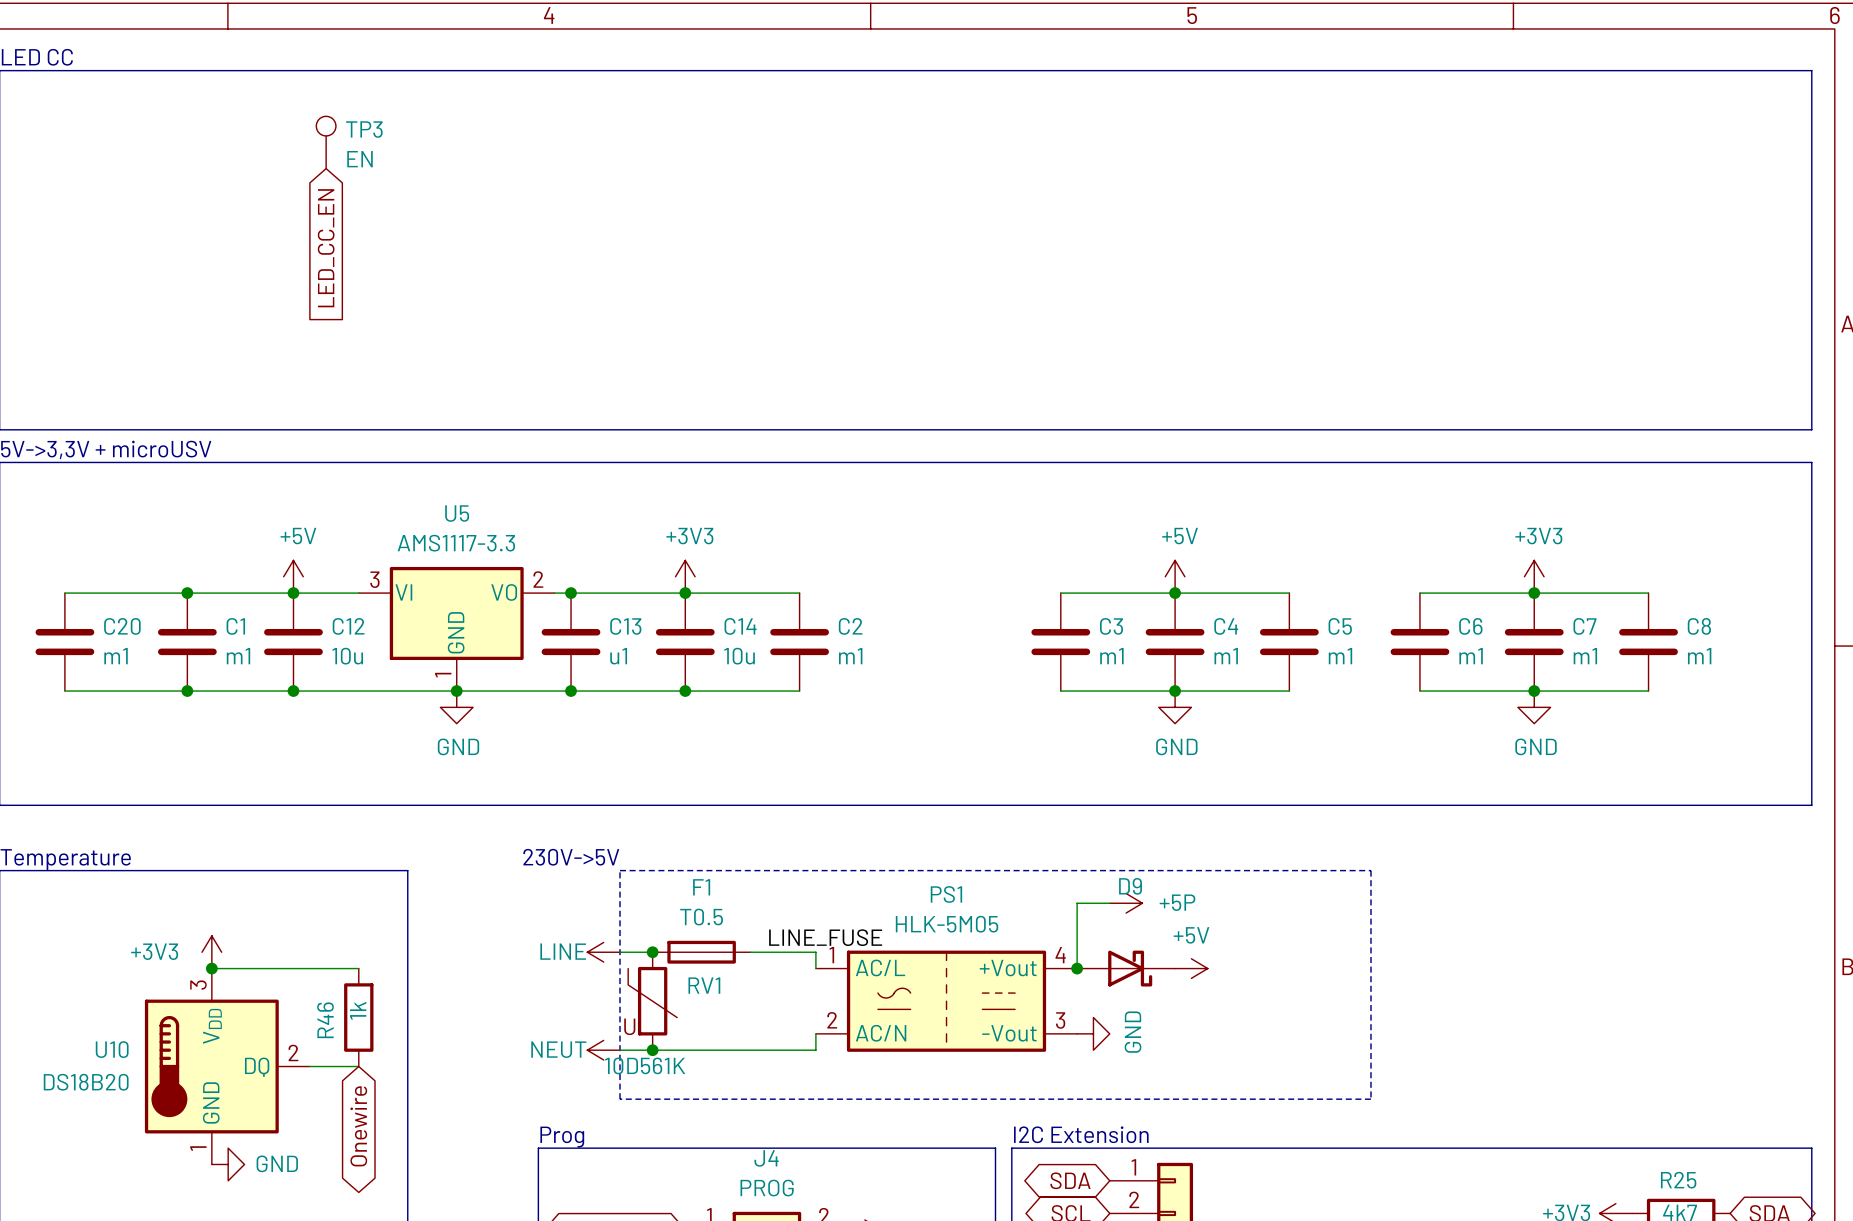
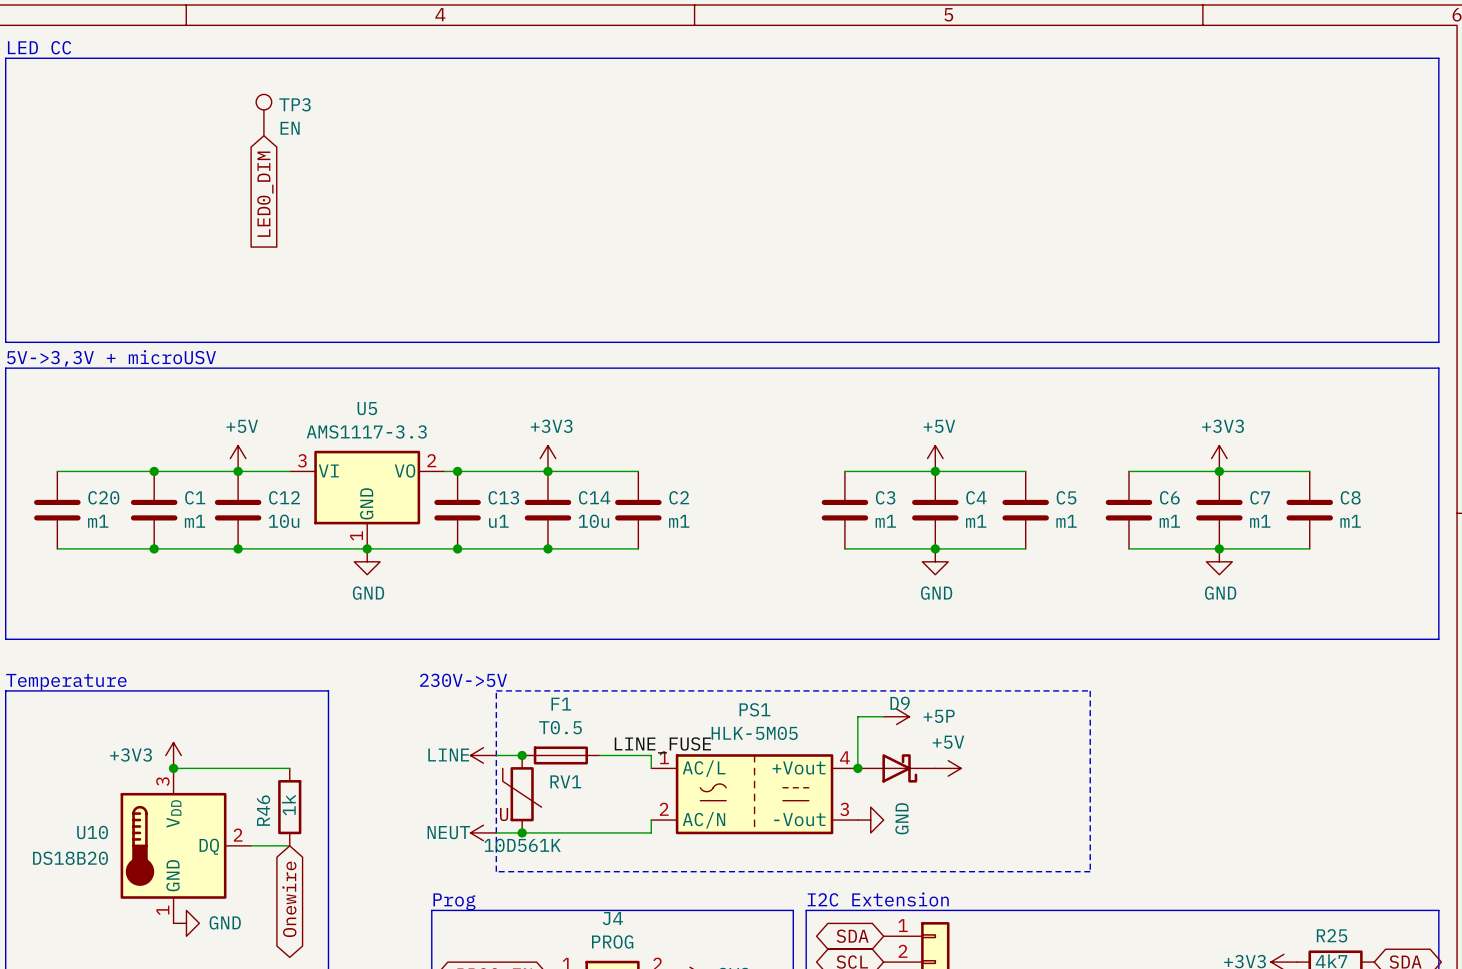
global label: LED_CC_EN (326, 248) -> LED0_DIM (265, 194)

